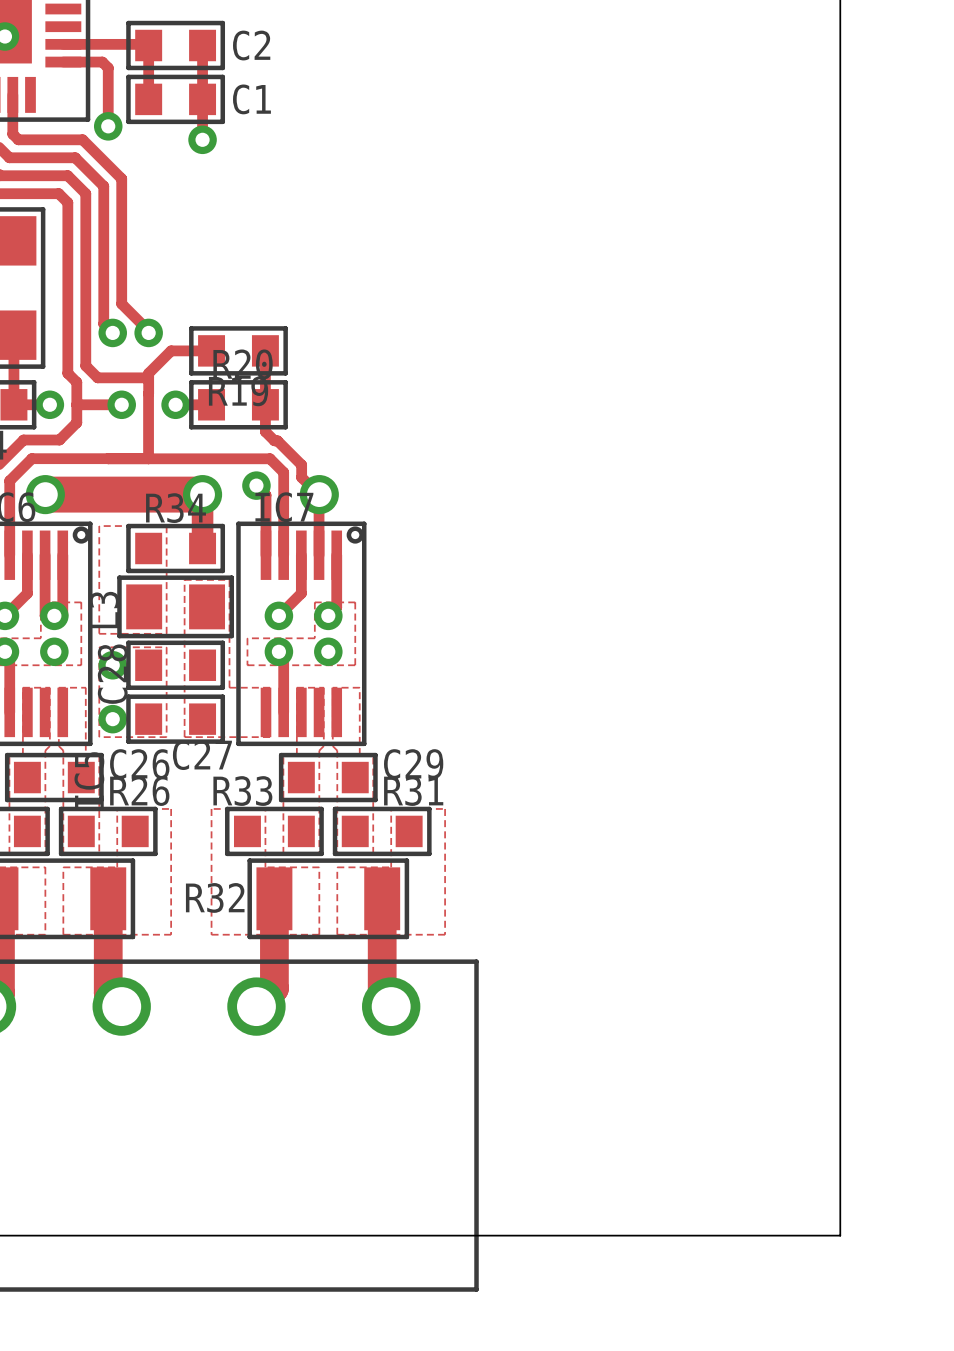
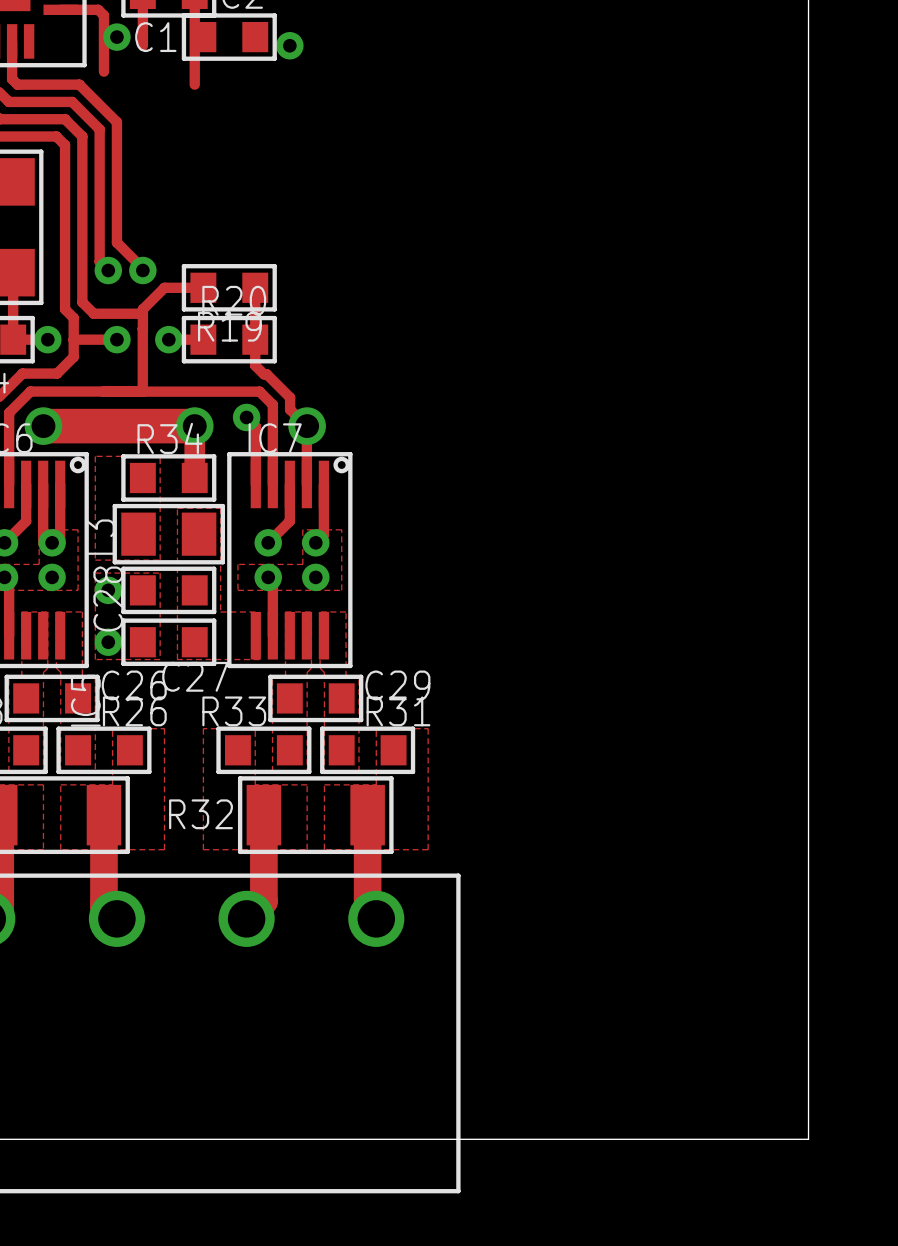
C1 position: (175, 99) -> (229, 37)
C1 name position: C1 (251, 99) -> C1 (155, 37)
via: none -> (289, 45)
via position: (108, 126) -> (116, 37)
via: (202, 139) -> none

